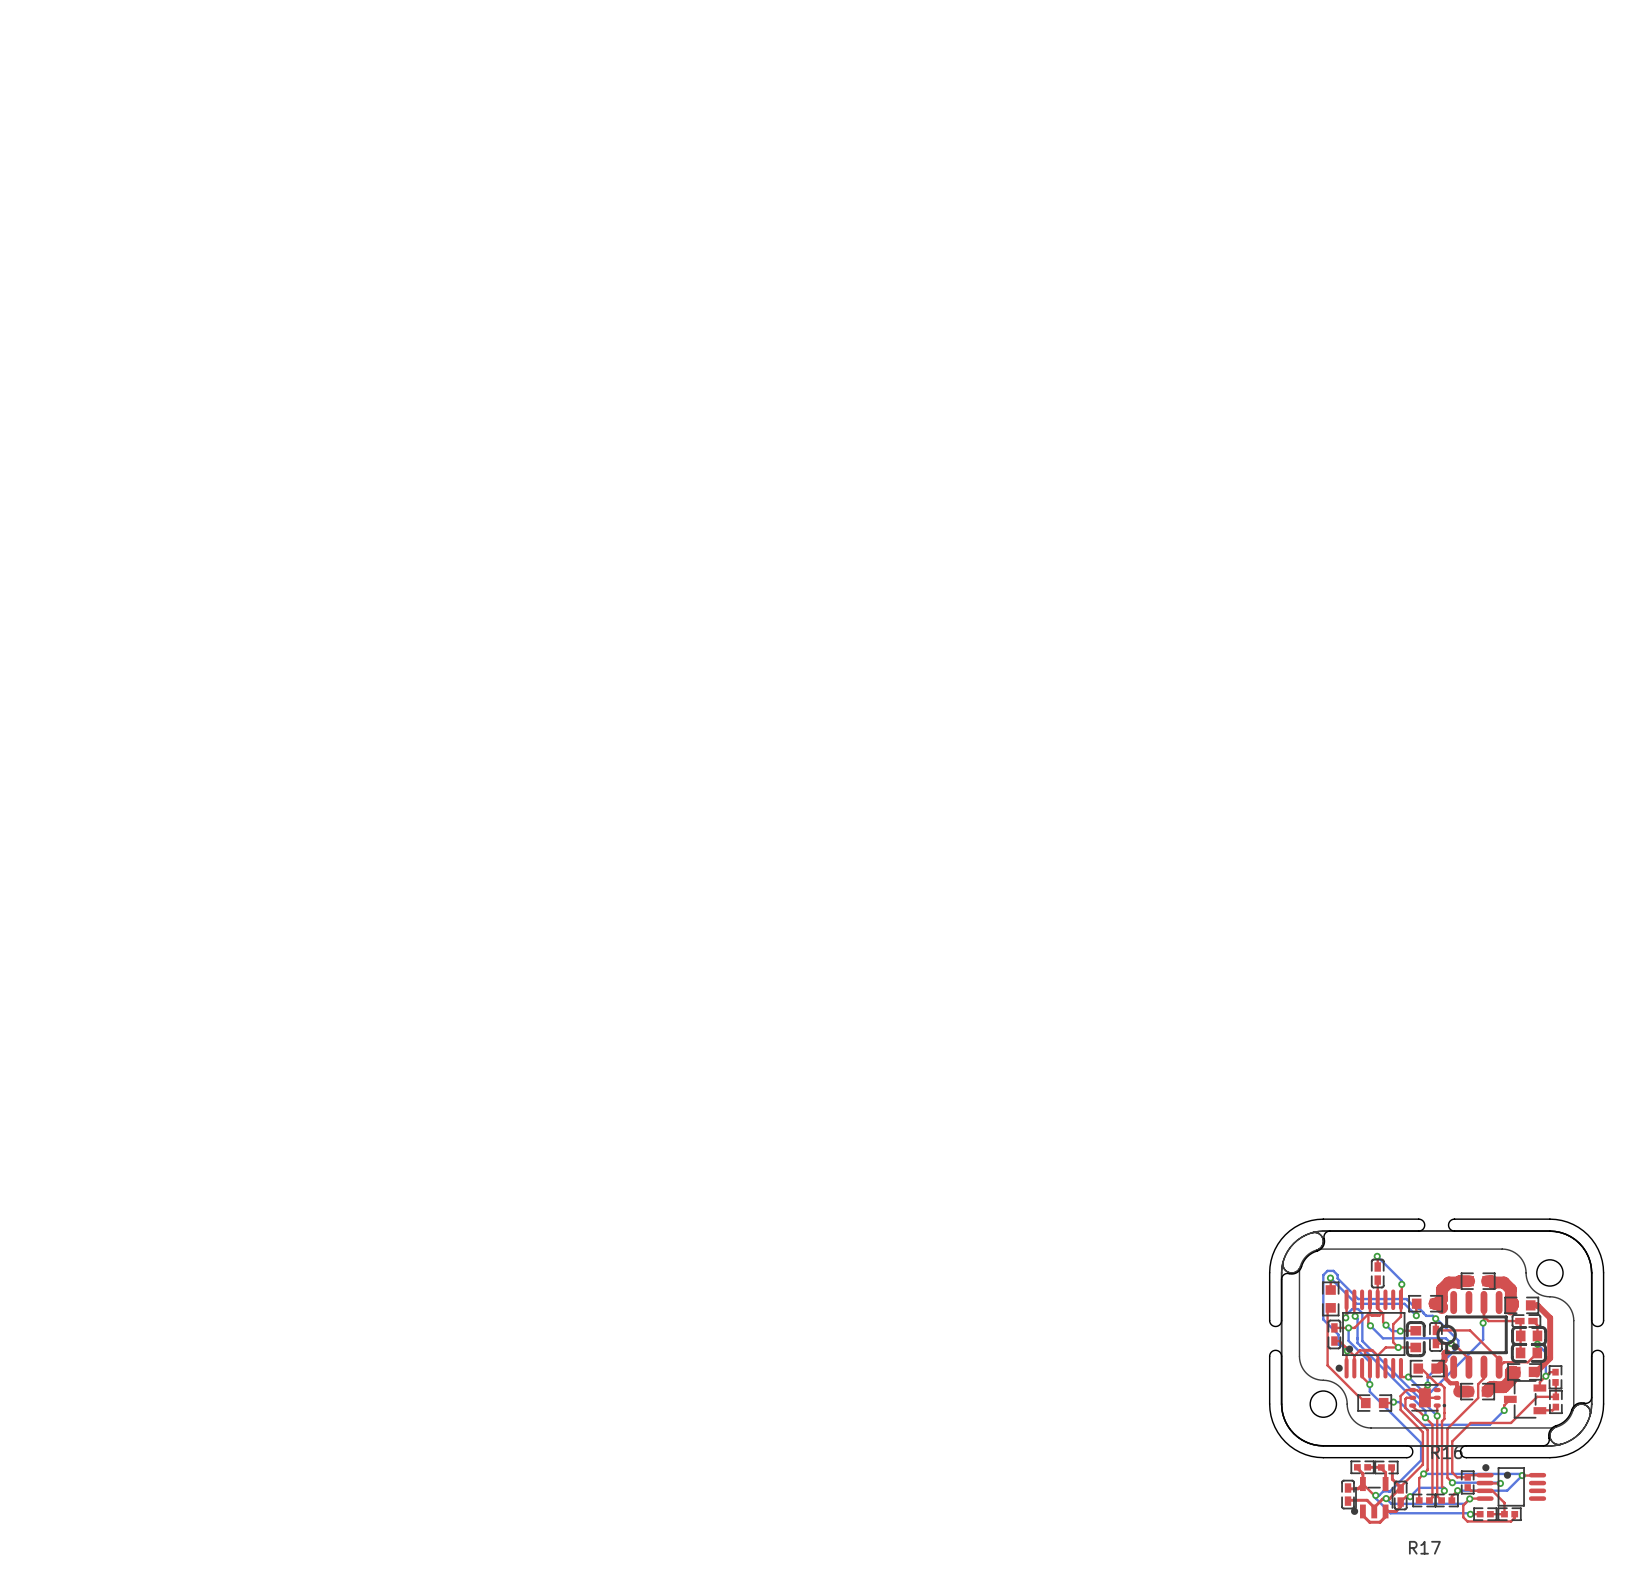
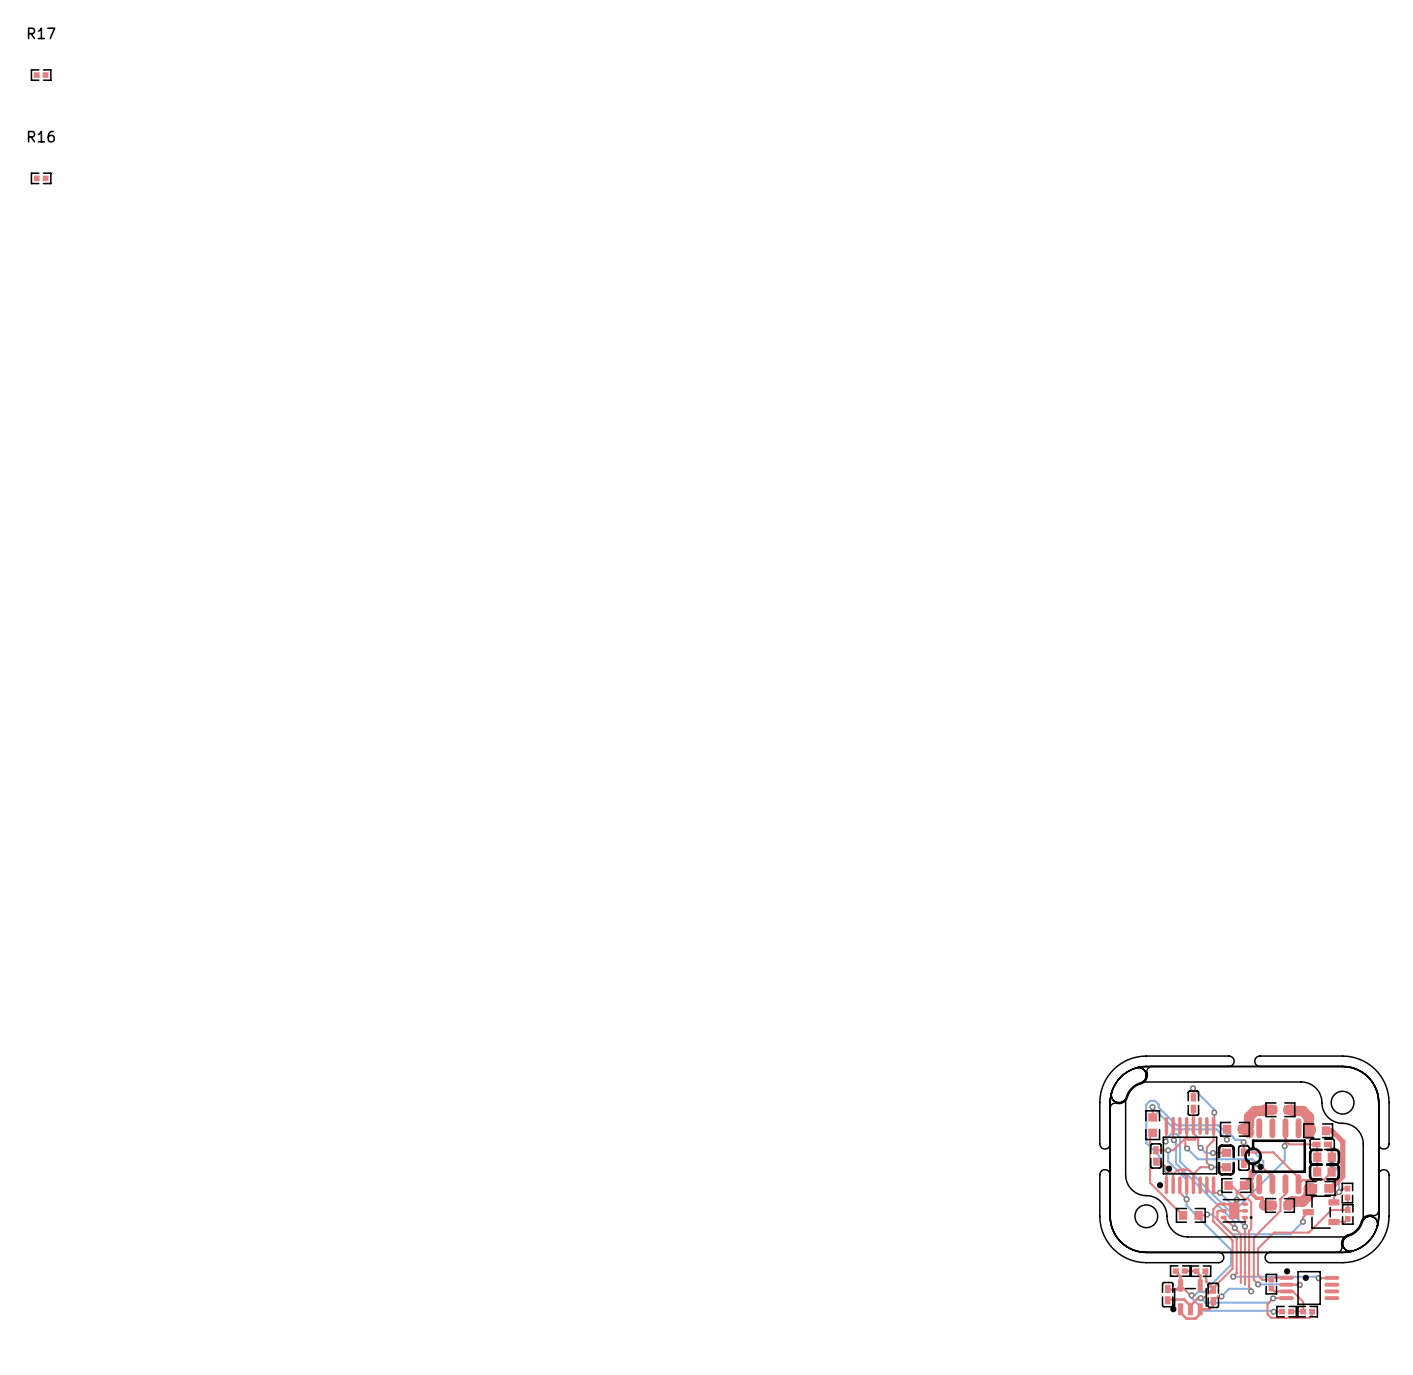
top track: (1423, 1473) (1419, 1478) (1419, 1500) -> none
bottom track: (1522, 1475) (1507, 1490) (1457, 1490) -> none
top track: (1432, 1481) (1432, 1497) (1429, 1500) -> none
top track: (1437, 1483) (1437, 1496) (1441, 1500) -> none
top track: (1457, 1490) (1451, 1496) (1451, 1500) -> none
via: (1457, 1490) -> none
R17 position: (1424, 1500) -> (41, 75)
R16 position: (1446, 1500) -> (41, 178)
R17 name position: R17 (1424, 1547) -> R17 (41, 33)

